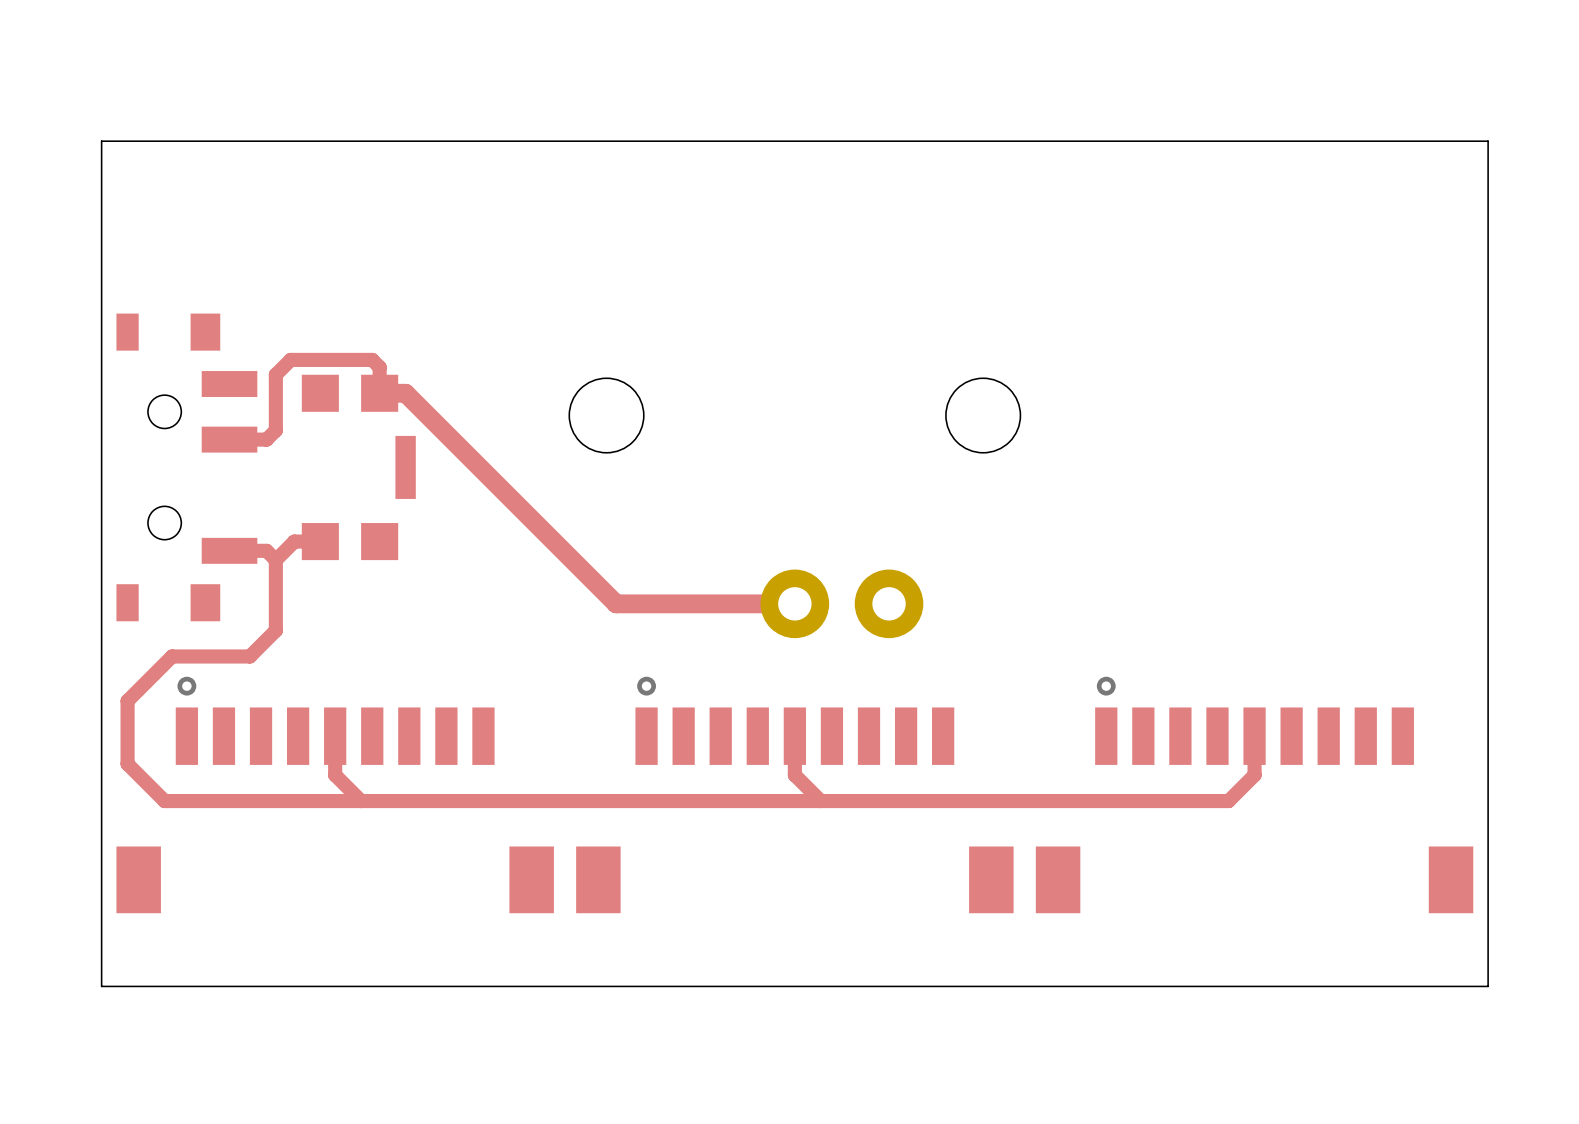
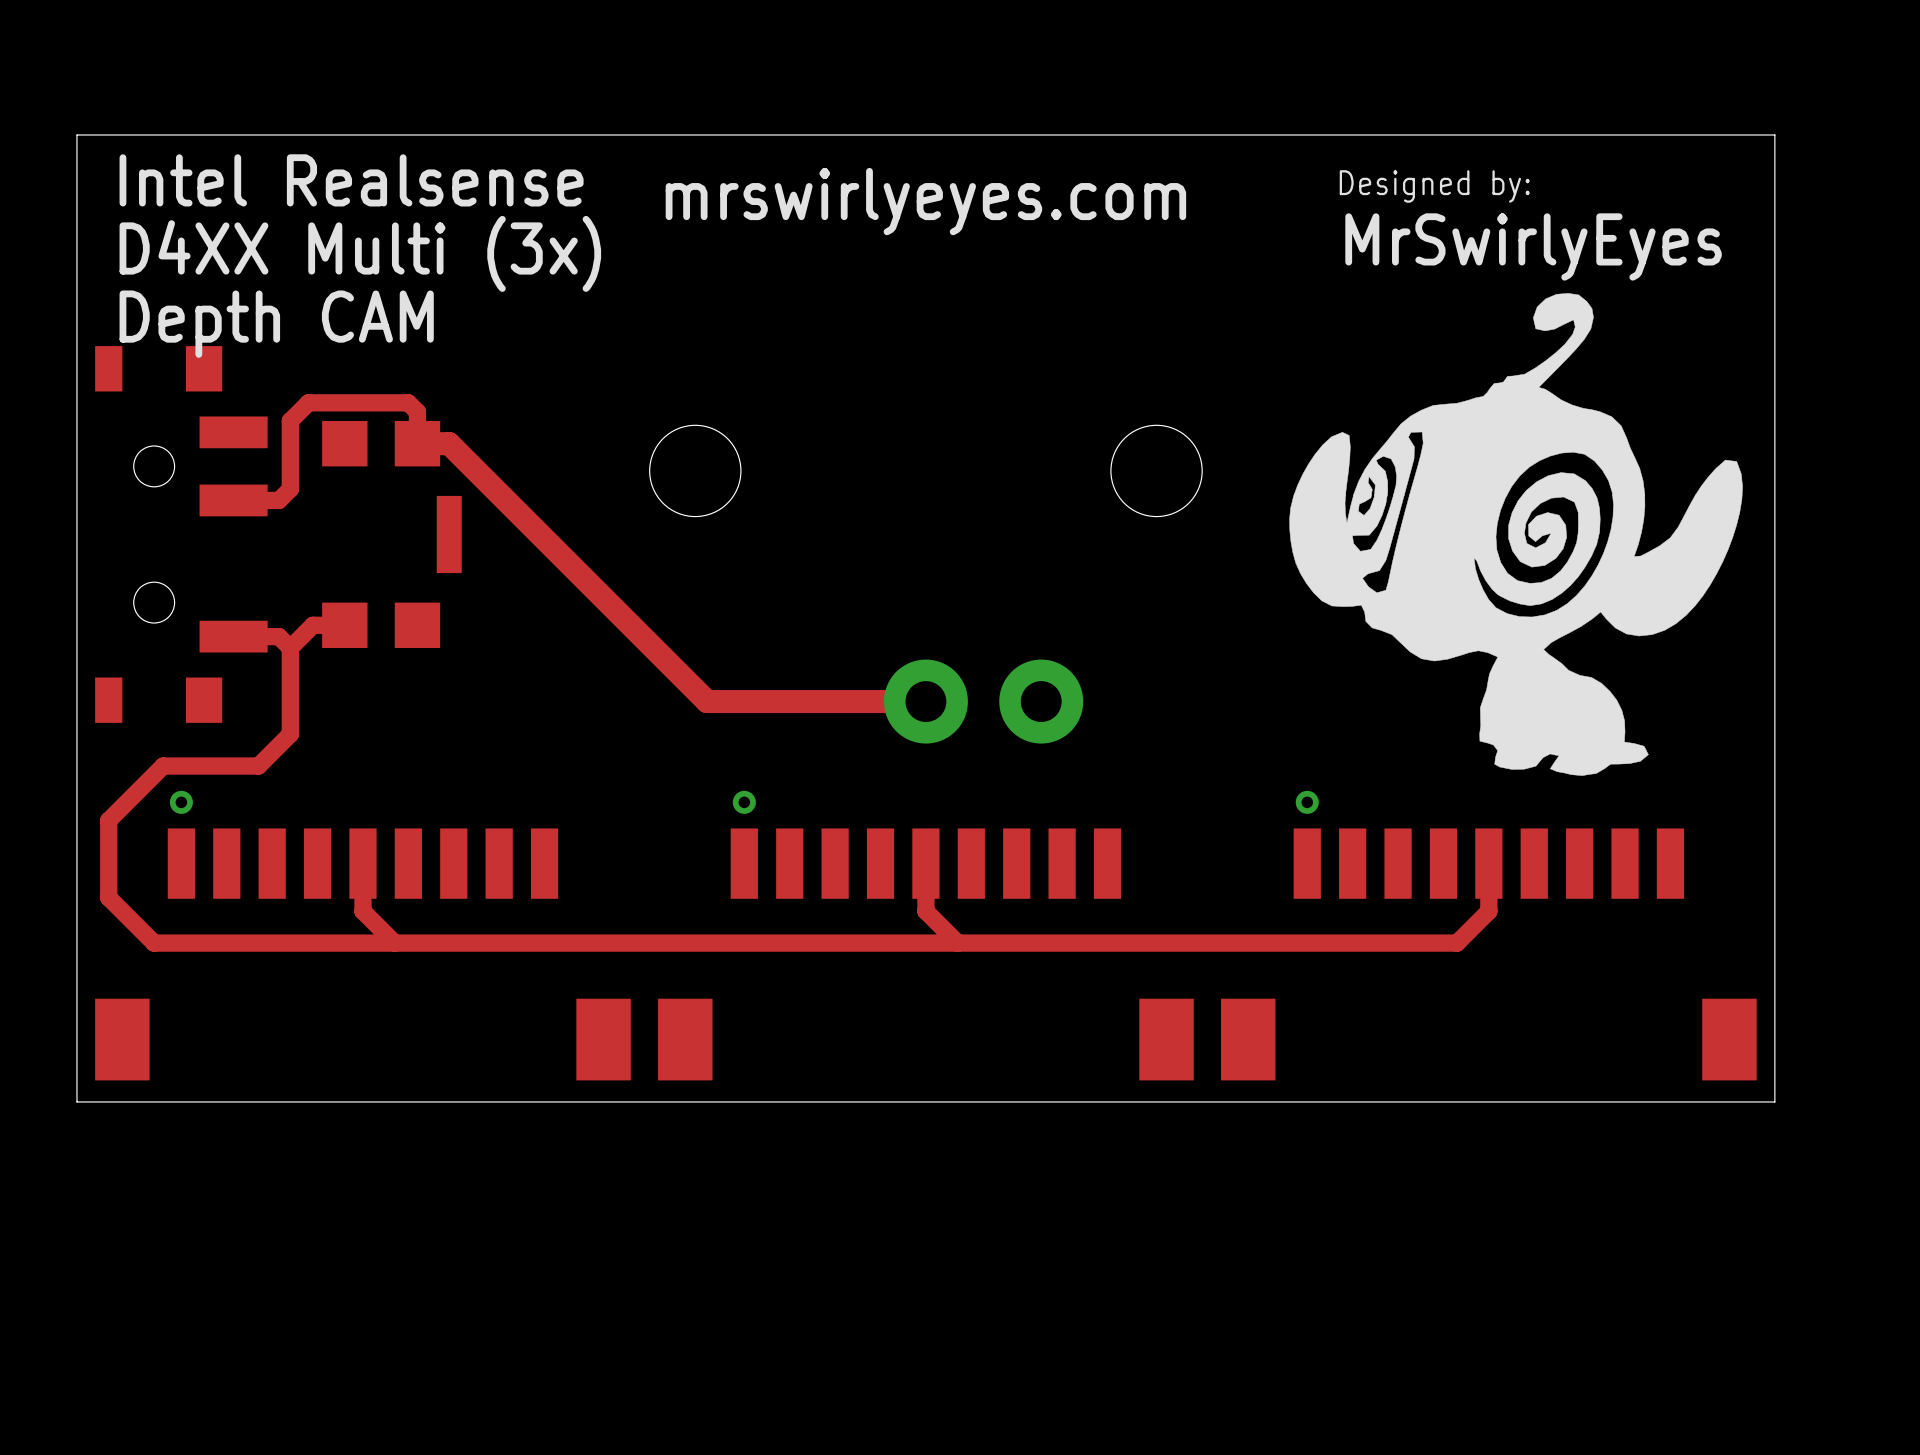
text: none -> Intel Realsense (351, 180)
text: none -> Designed by: (1434, 186)
text: none -> mrswirlyeyes.com (925, 201)
text: none -> MrSwirlyEyes (1533, 246)
text: none -> D4XX Multi (3x) (360, 253)
drawing: none -> [1289, 293, 1743, 776]
text: none -> Depth CAM (276, 324)
board edge: (1488, 930) (1488, 986) (101, 986) (101, 930) -> (1774, 1101) (76, 1101)

